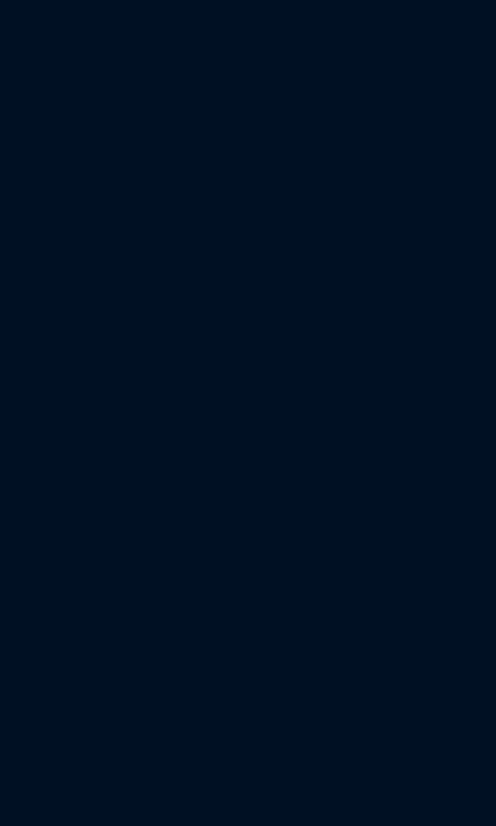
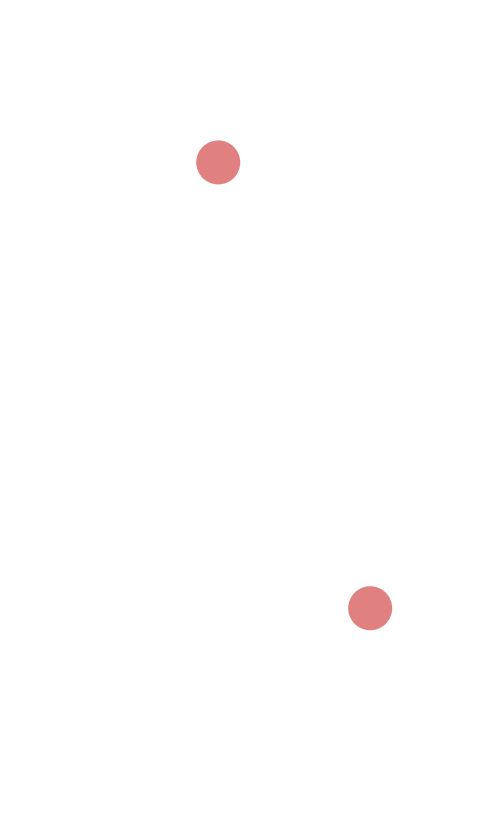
part: none -> (218, 162)
part: none -> (370, 608)

